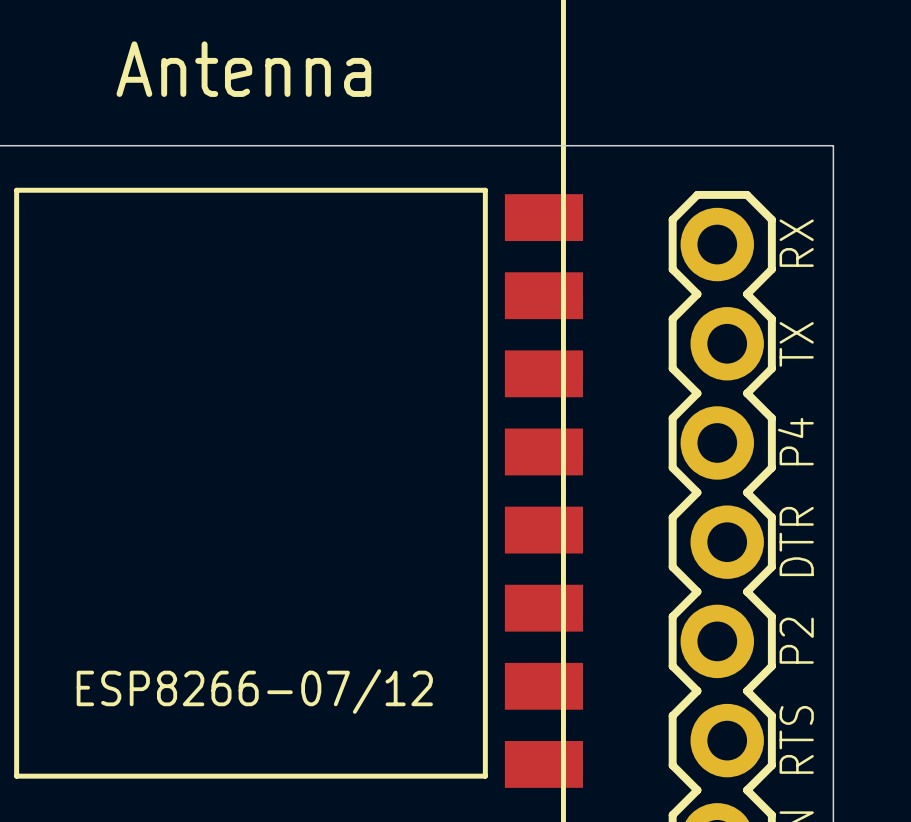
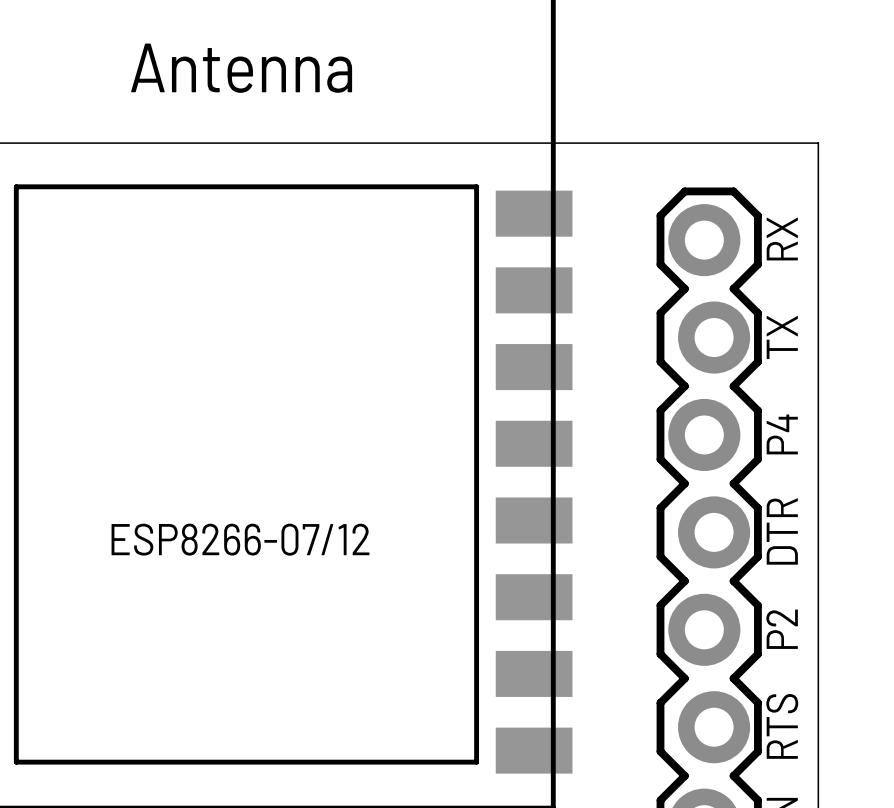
ESP8266-07/12 name position: ESP8266-07/12 (254, 691) -> ESP8266-07/12 (240, 539)

